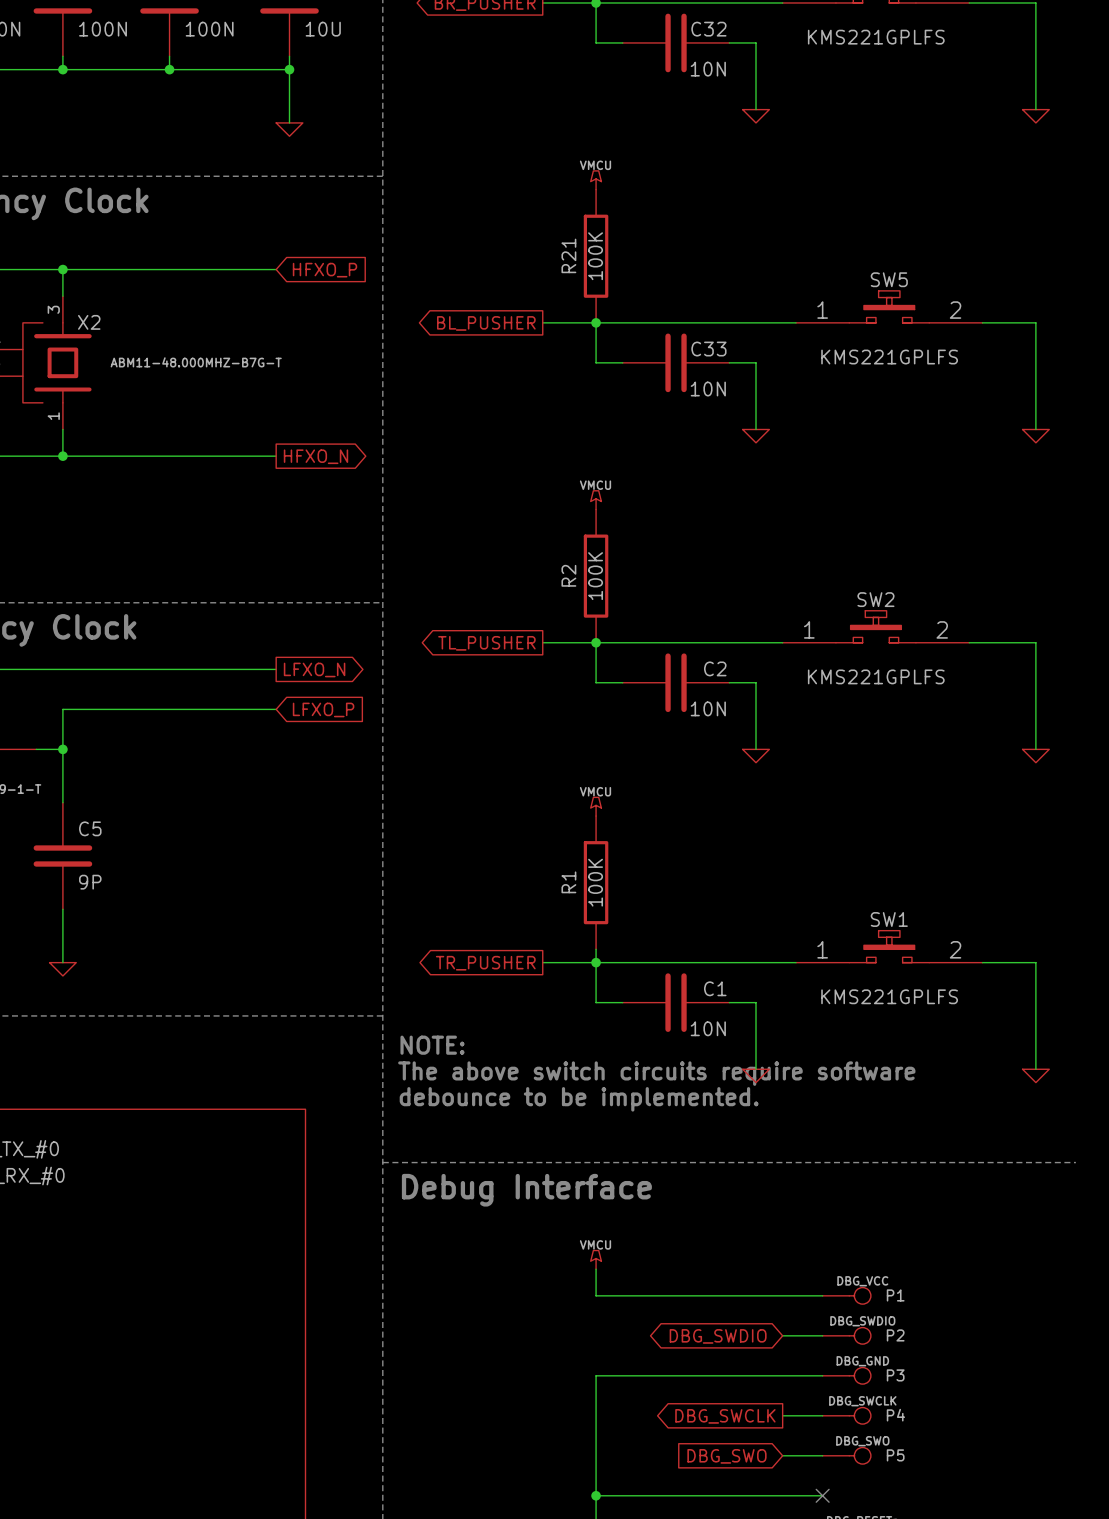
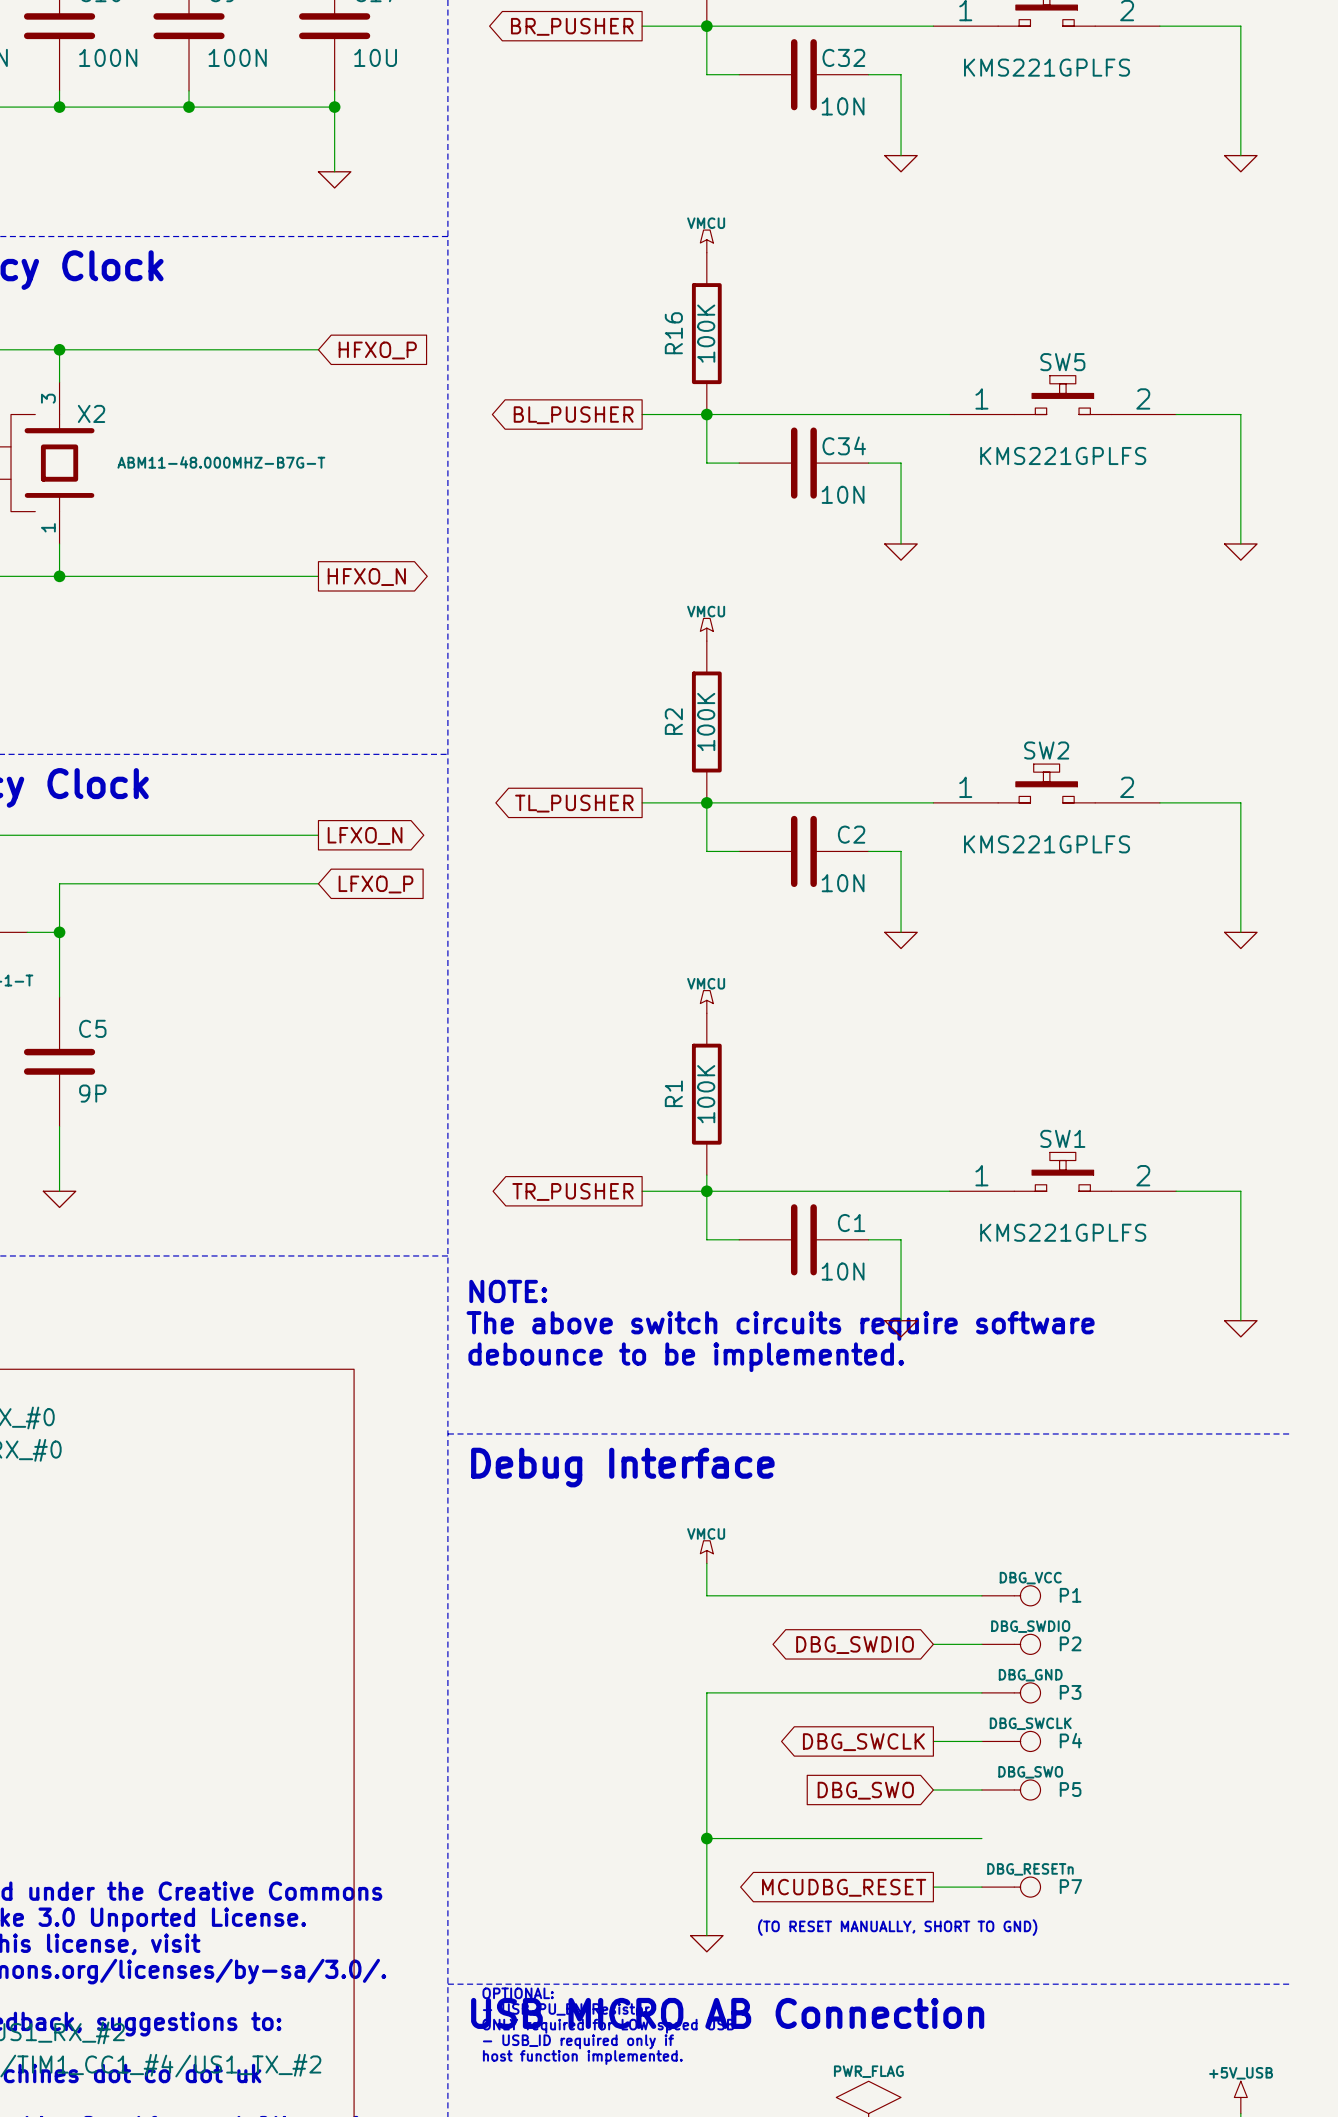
R21 name: R21 (568, 255) -> R16 (673, 333)
C33 name: C33 (708, 349) -> C34 (844, 445)
no-connect mark: (822, 1495) -> none

